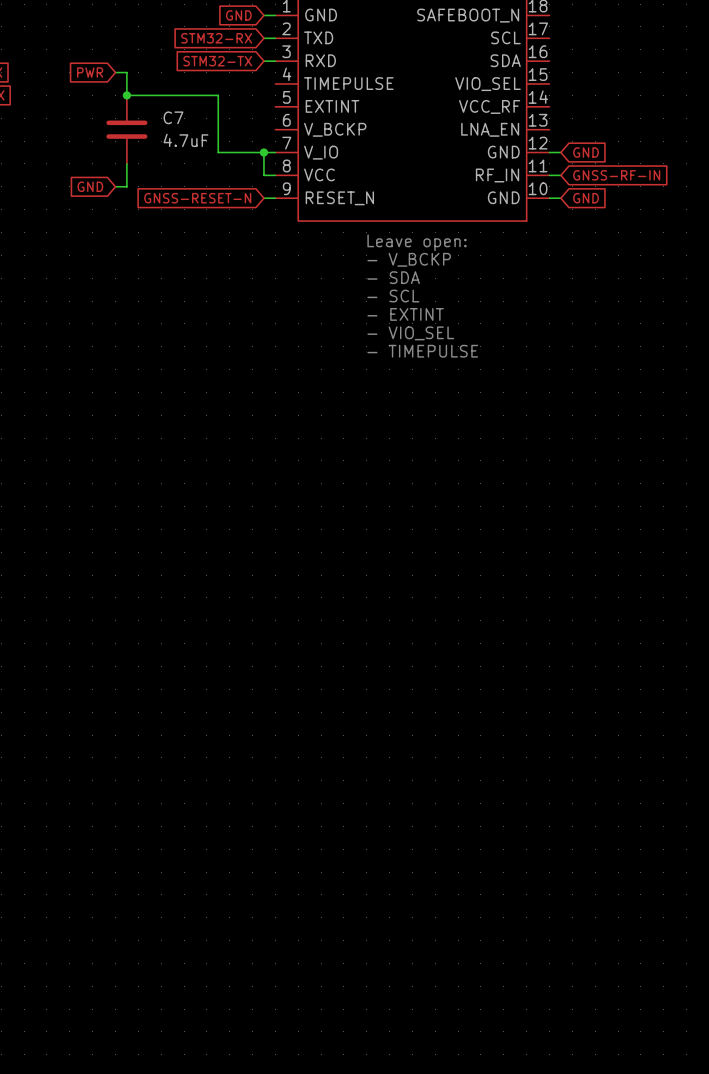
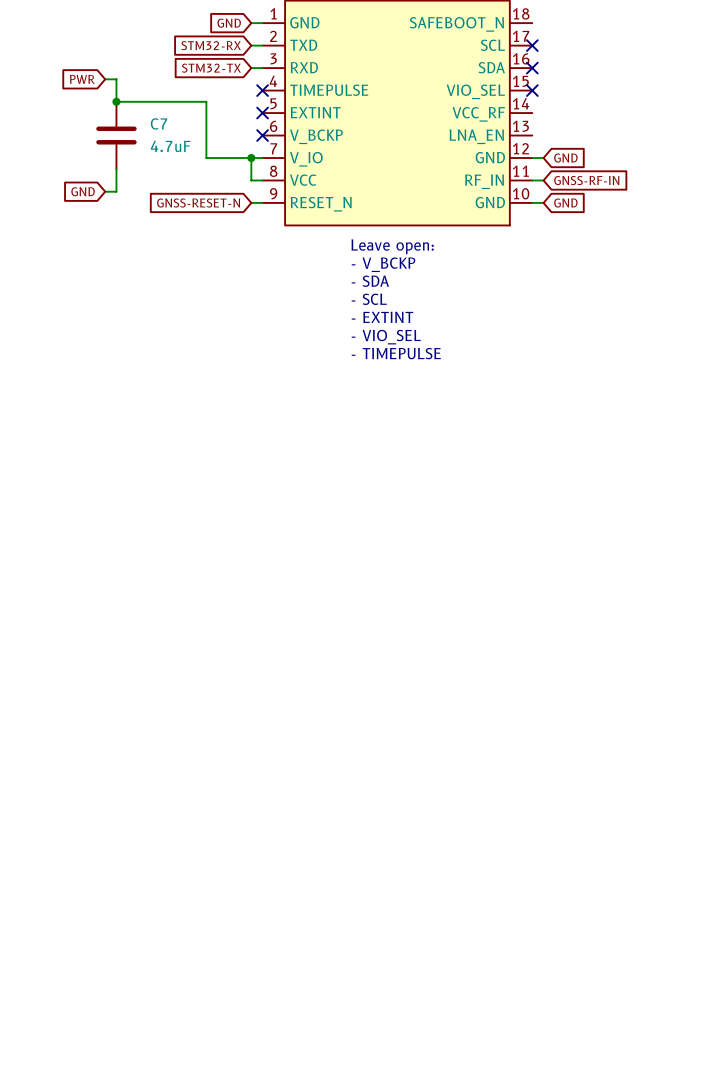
no-connect mark: none -> (532, 45)
no-connect mark: none -> (532, 68)
no-connect mark: none -> (262, 90)
no-connect mark: none -> (532, 90)
no-connect mark: none -> (262, 113)
no-connect mark: none -> (262, 135)

